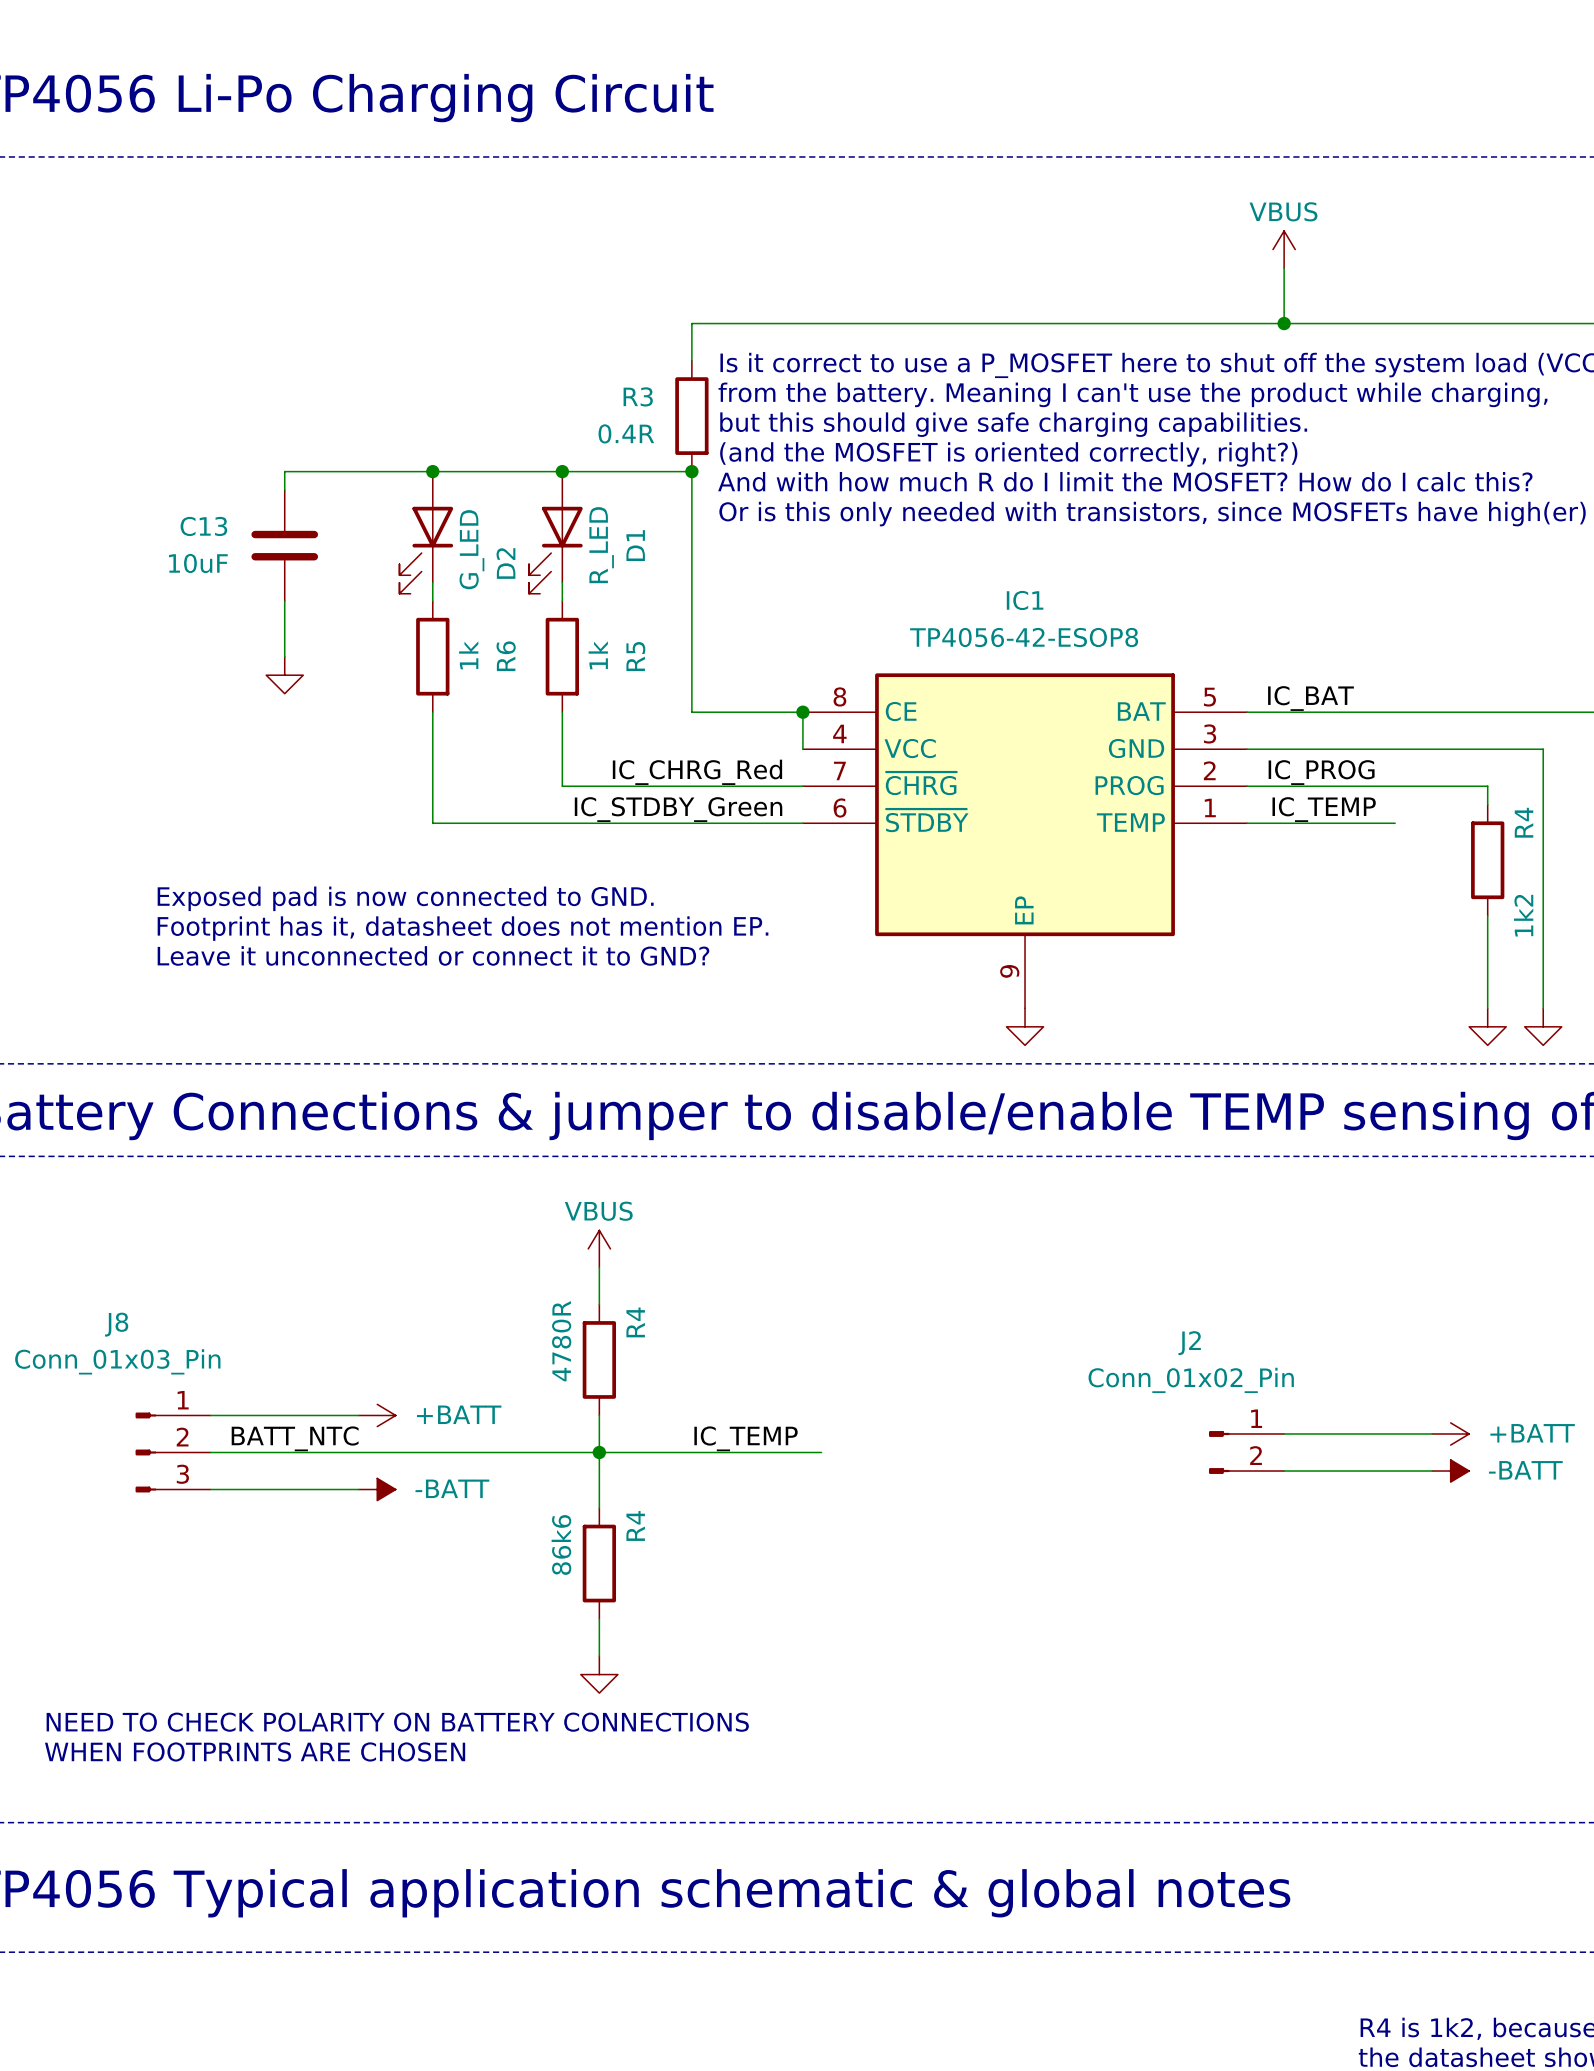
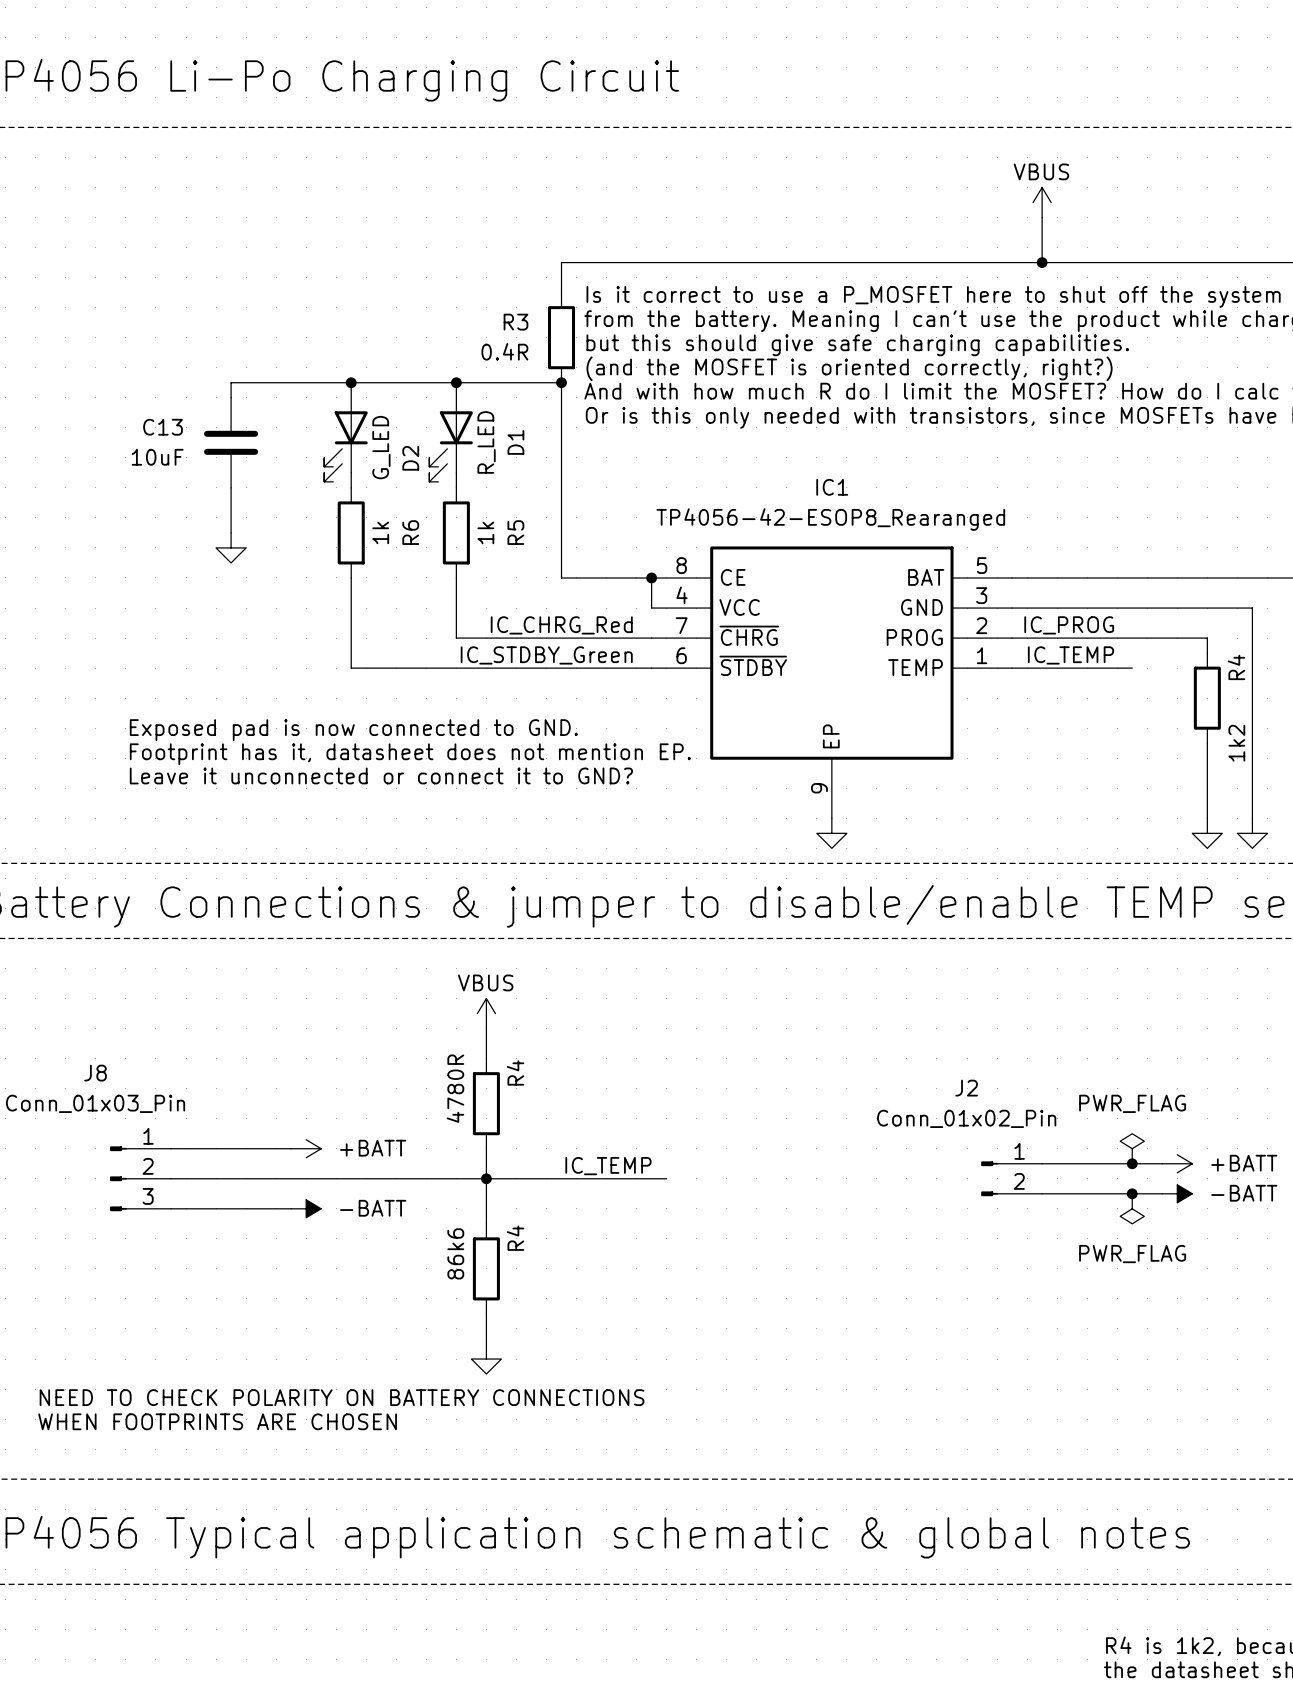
IC1 value: TP4056-42-ESOP8 (1024, 637) -> TP4056-42-ESOP8_Rearanged (830, 519)
label: IC_BAT (1310, 698) -> none
power symbol: none -> PWR_FLAG (1132, 1148)
junction: none -> (1132, 1163)
label: BATT_NTC (295, 1438) -> none
junction: none -> (1132, 1193)
power symbol: none -> PWR_FLAG (1132, 1208)

